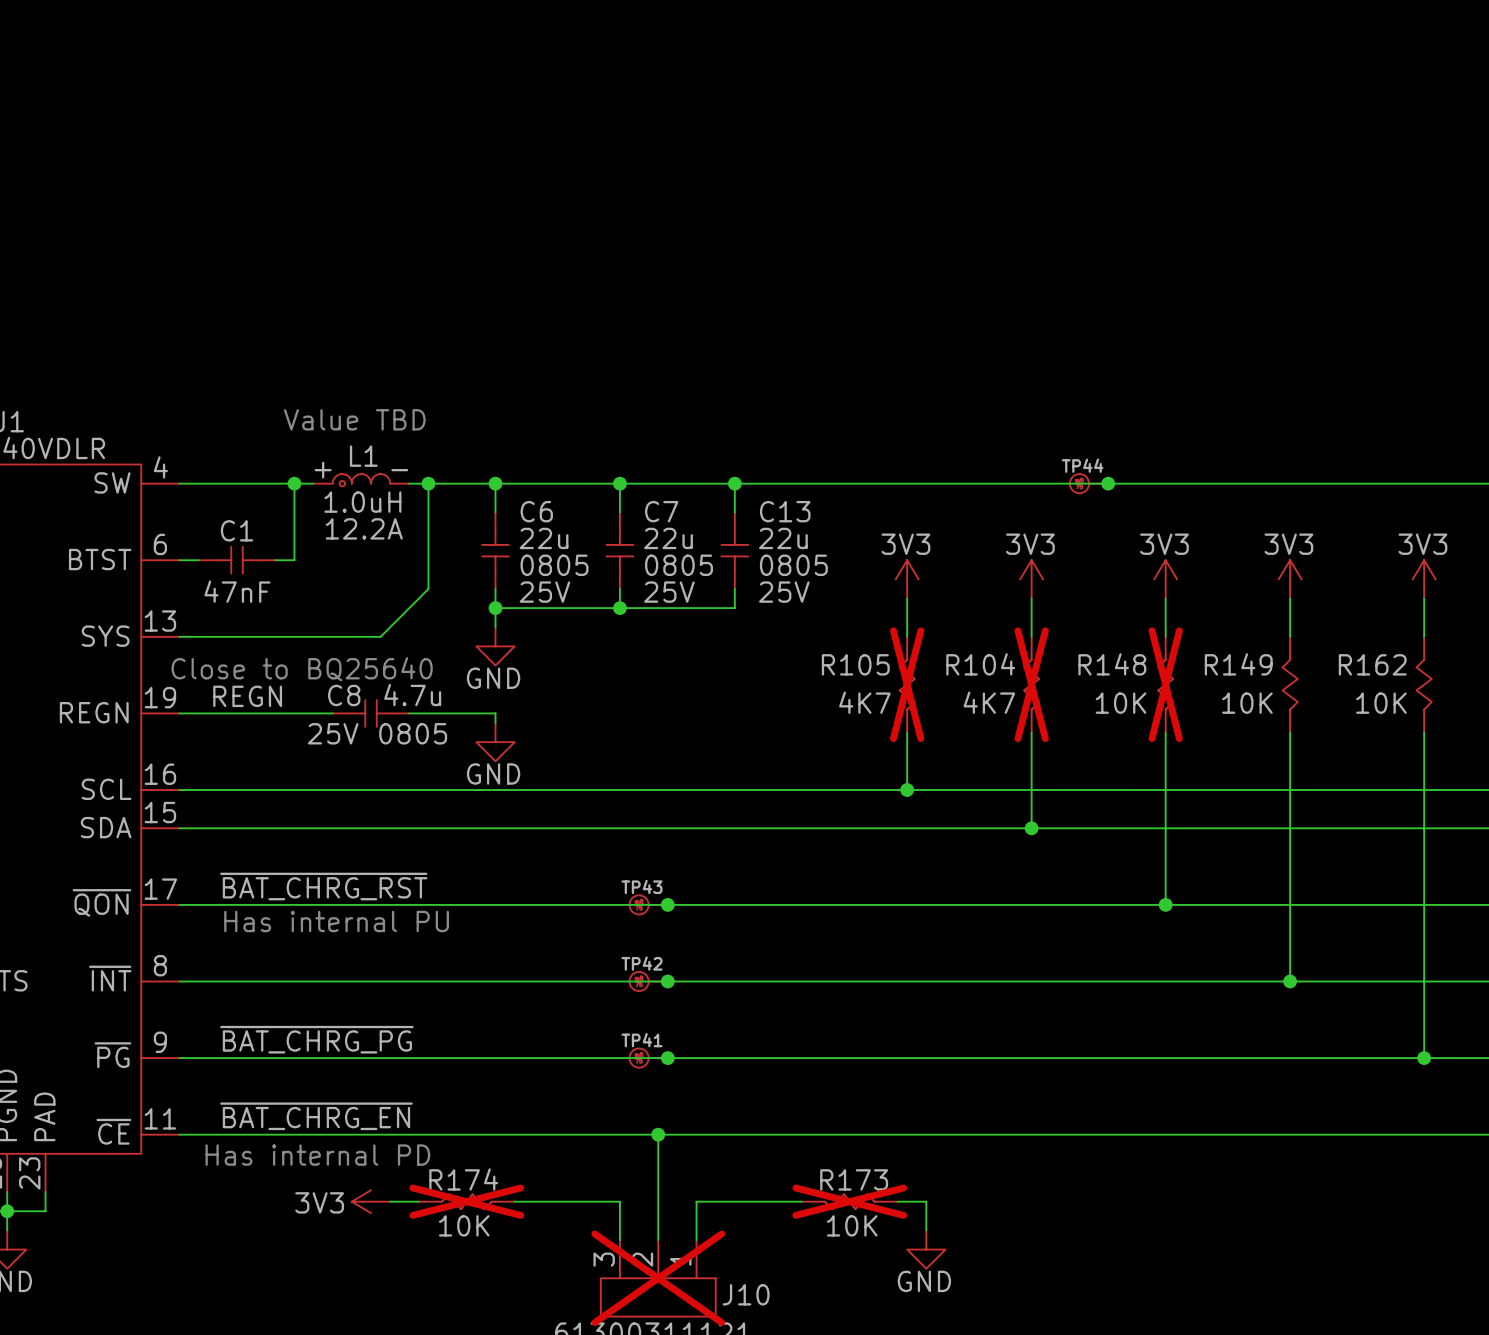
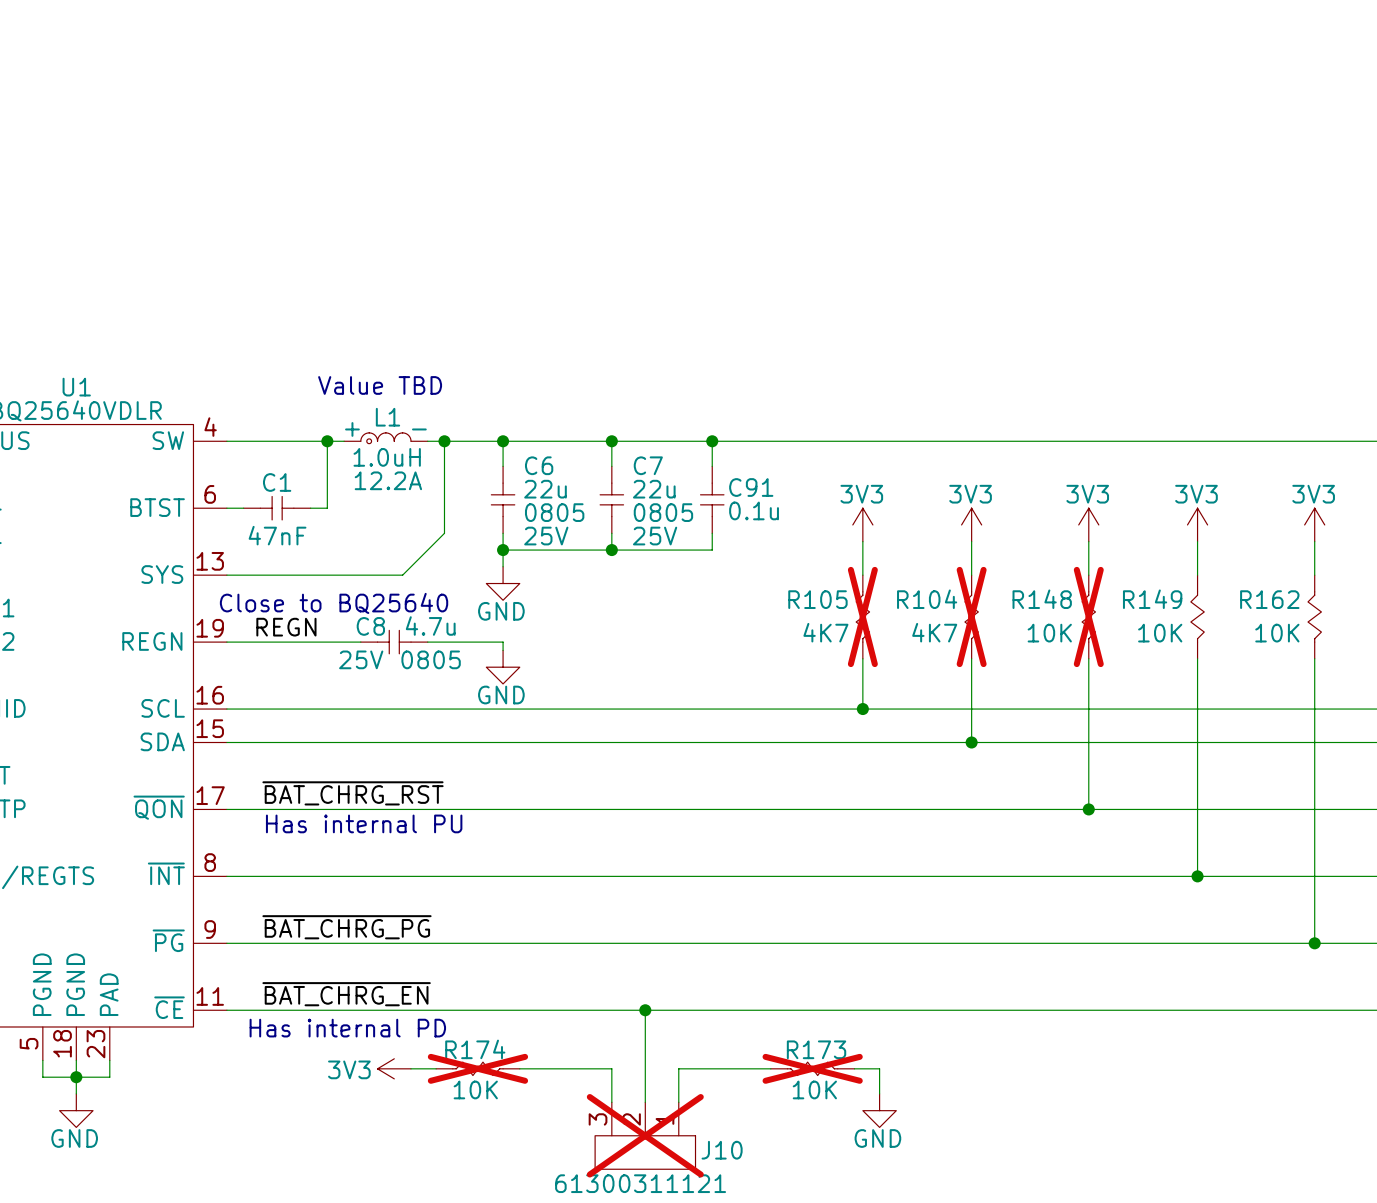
TP44: (1089, 483) -> none
junction: (1108, 483) -> none
C13 name: C13 (785, 511) -> C91 (751, 487)
C13 value: 22u (783, 538) -> 0.1u (754, 510)
C13 text: 0805 (793, 565) -> none
C13 text: 25V (784, 592) -> none
TP43: (648, 904) -> none
junction: (667, 904) -> none
TP42: (648, 981) -> none
junction: (667, 981) -> none
TP41: (648, 1058) -> none
junction: (667, 1058) -> none

